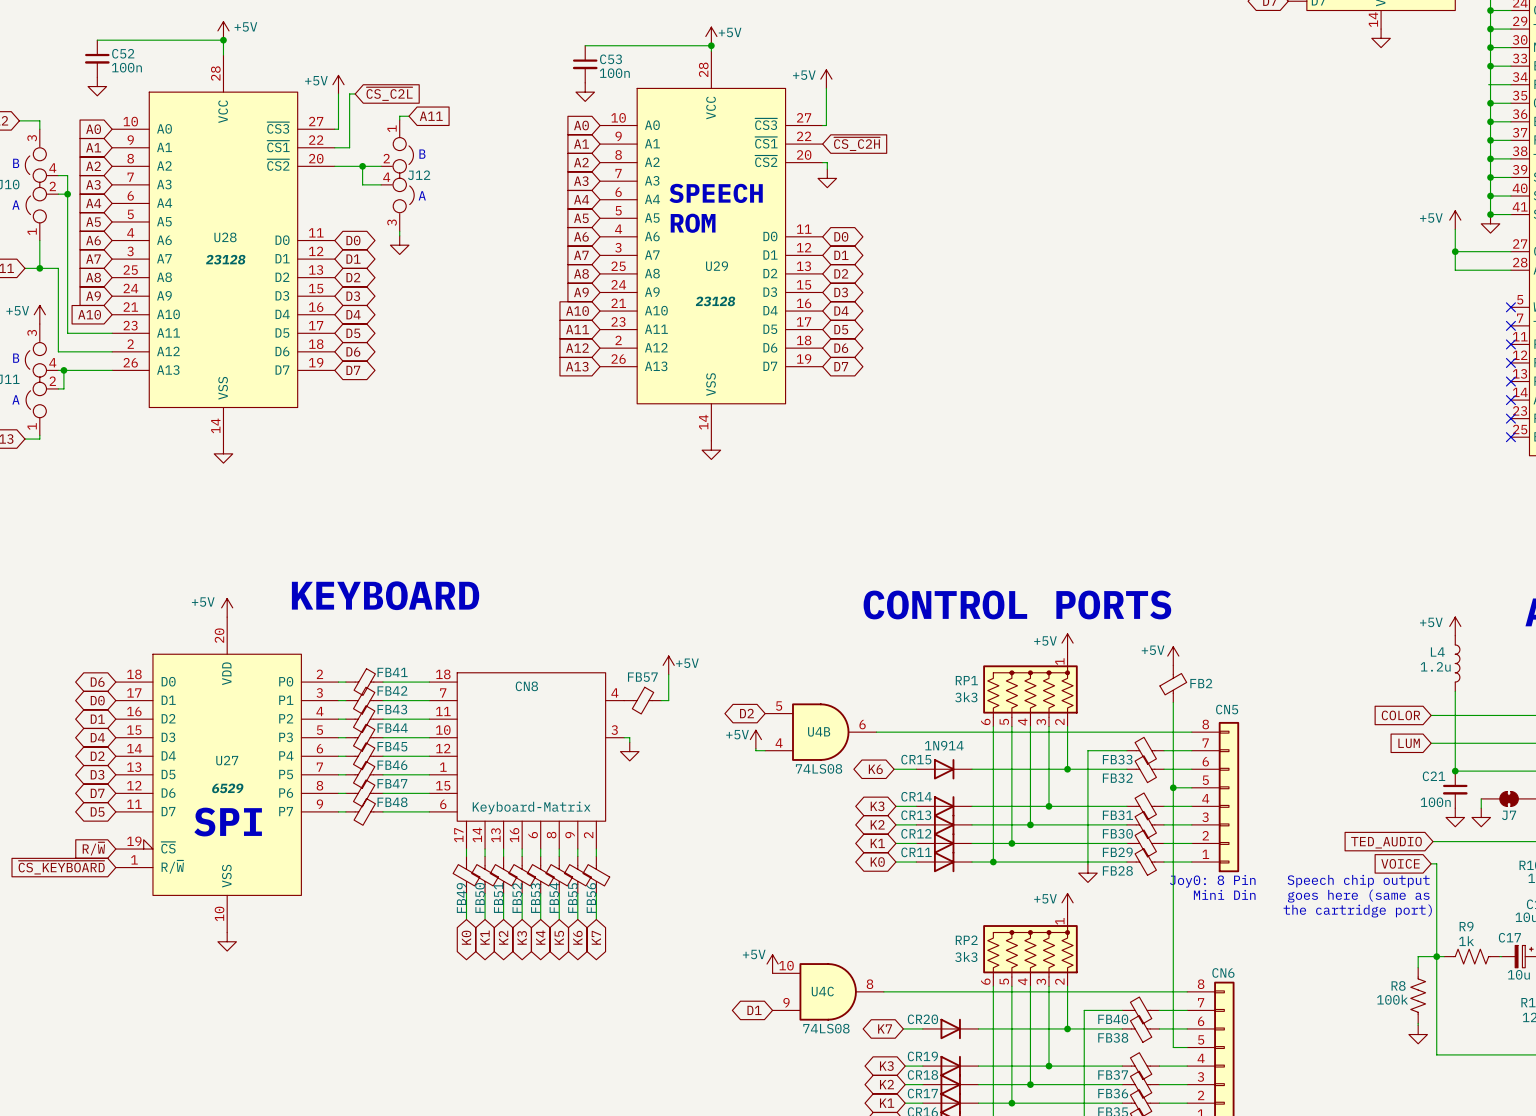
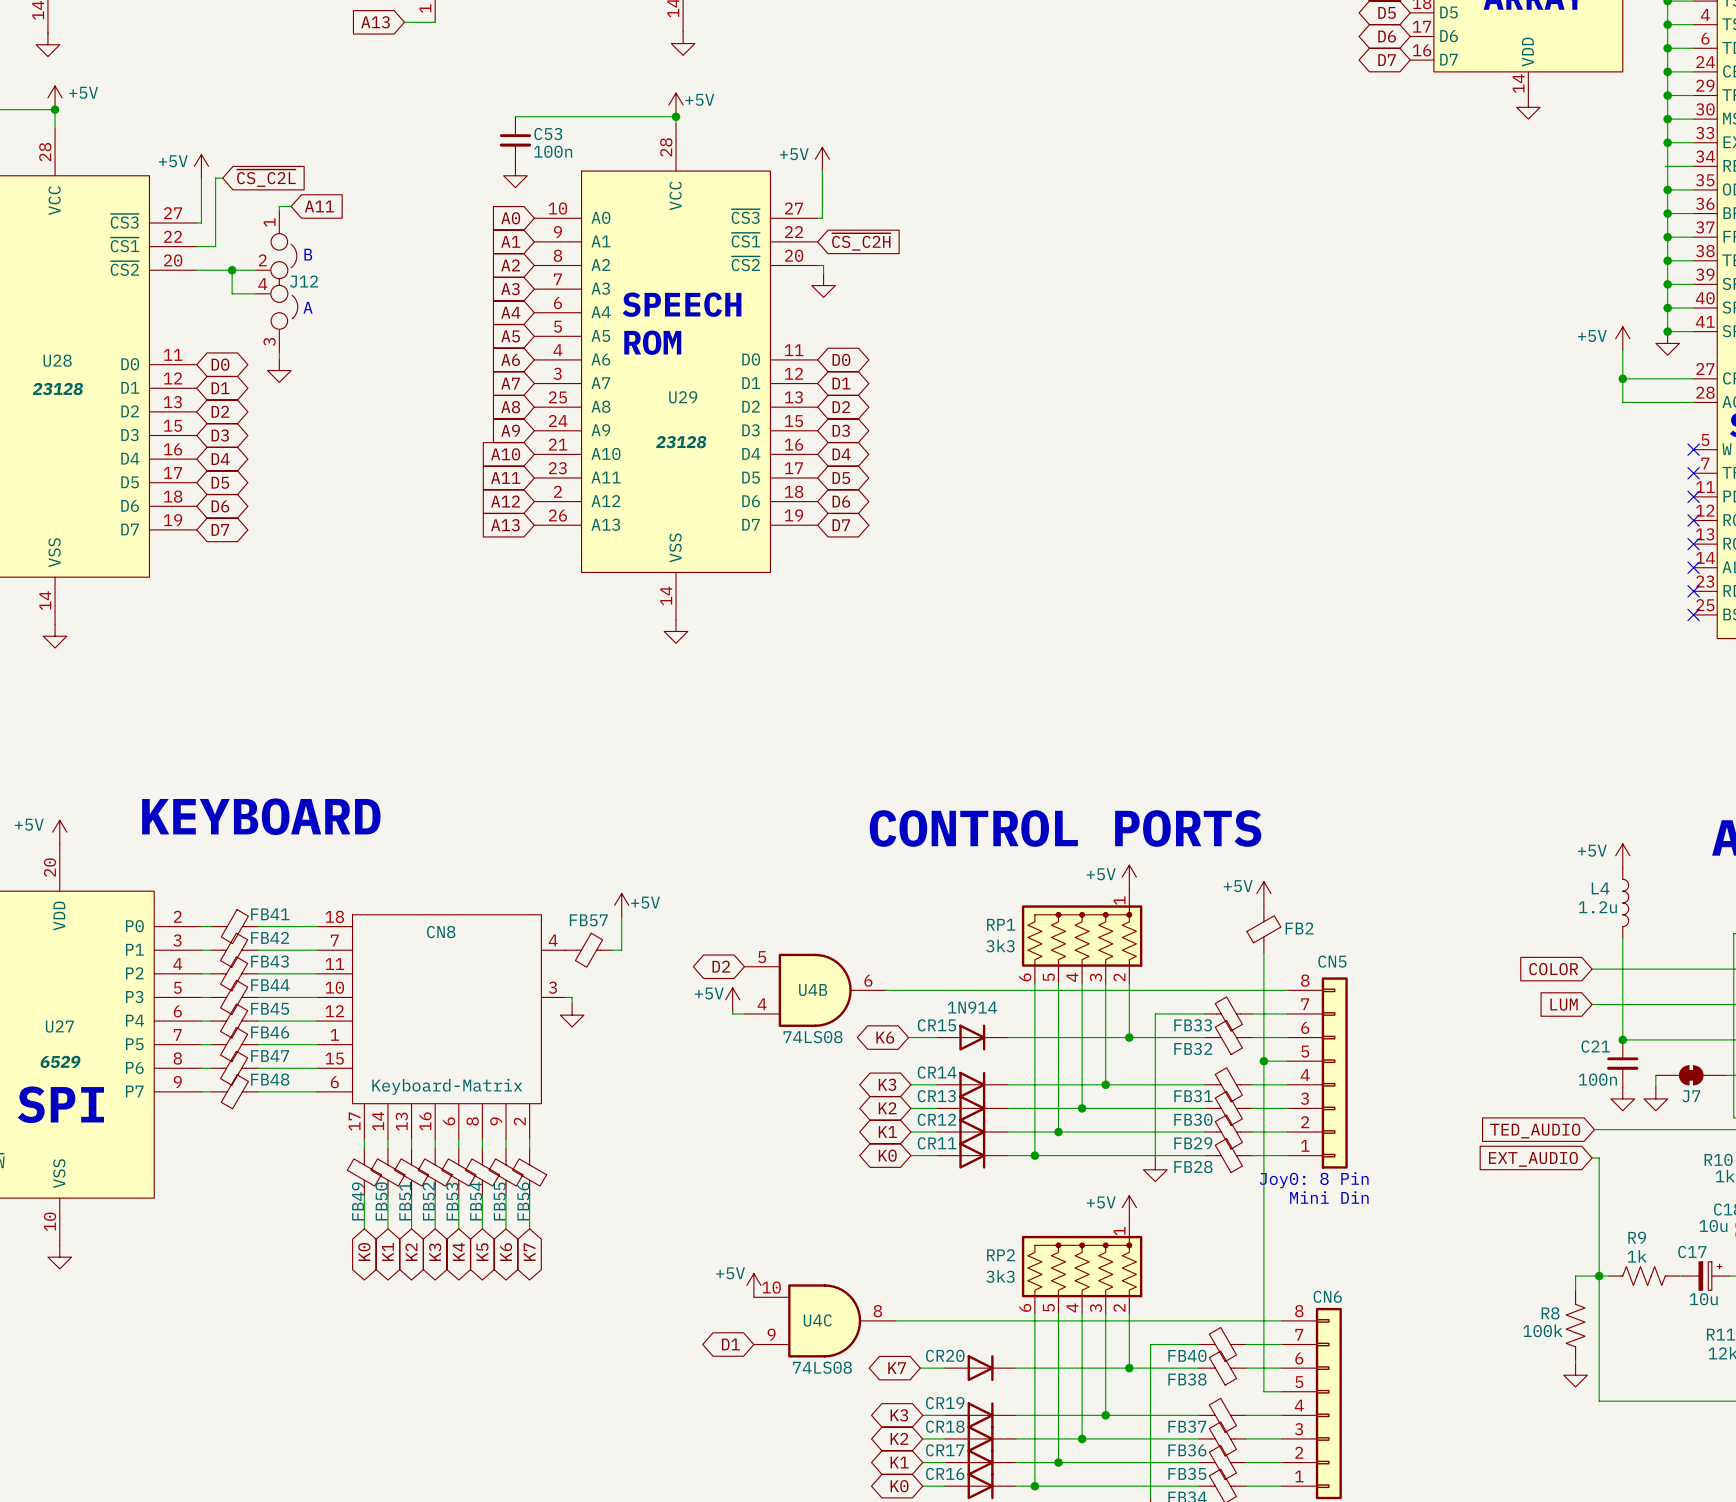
global label: VOICE (1400, 863) -> EXT_AUDIO (1533, 1159)
text: Speech chip output (1358, 881) -> none
text: goes here (same as (1358, 896) -> none
text: the cartridge port) (1357, 911) -> none

